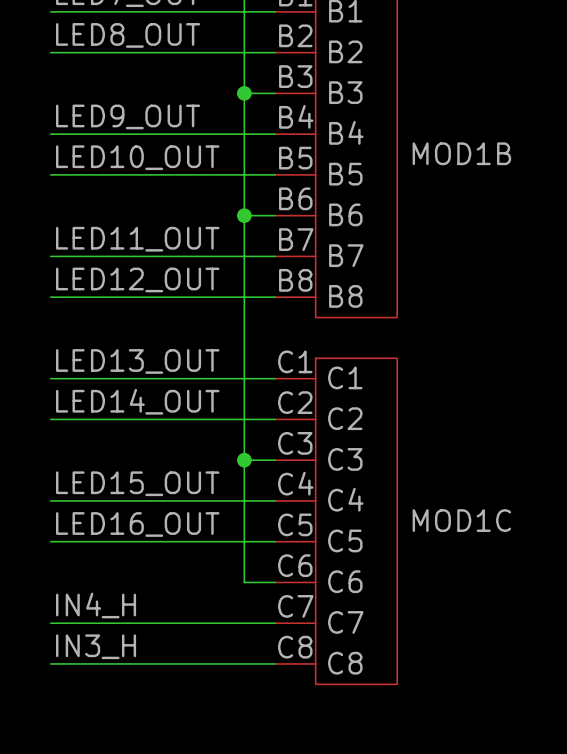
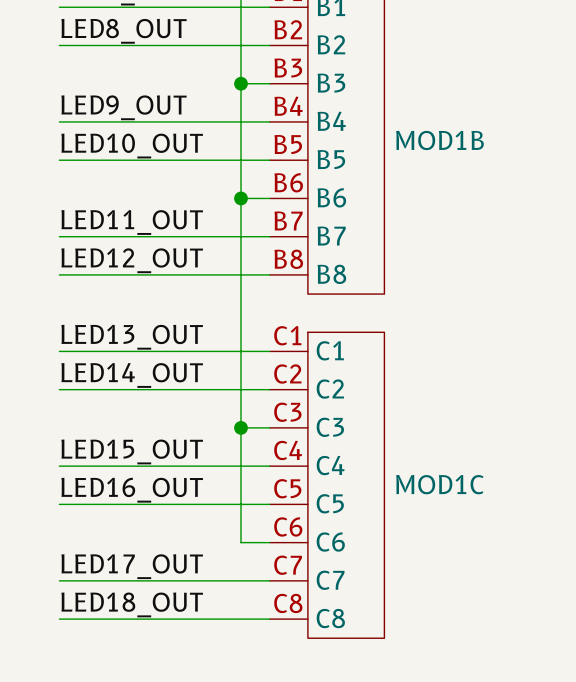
label: IN4_H (96, 605) -> LED17_OUT (132, 566)
label: IN3_H (96, 646) -> LED18_OUT (132, 604)

